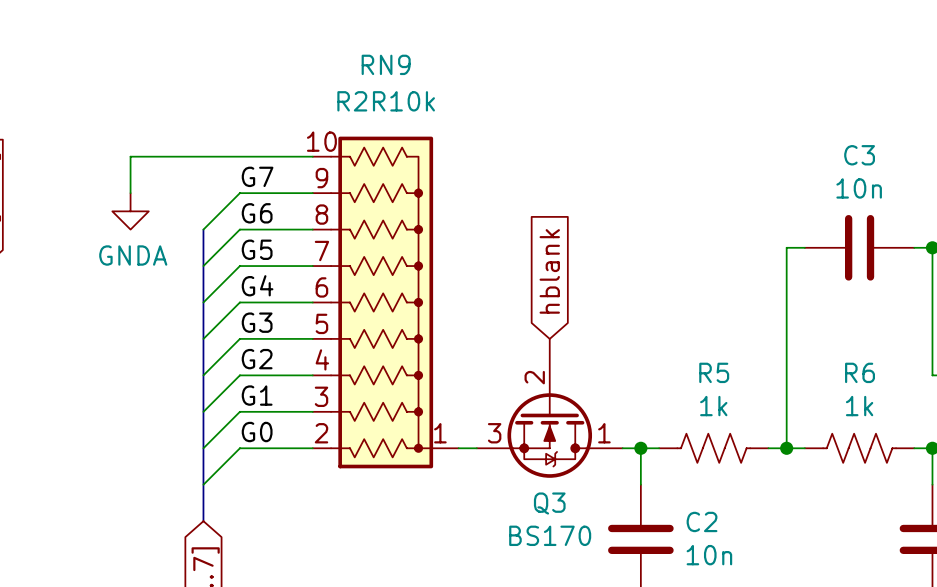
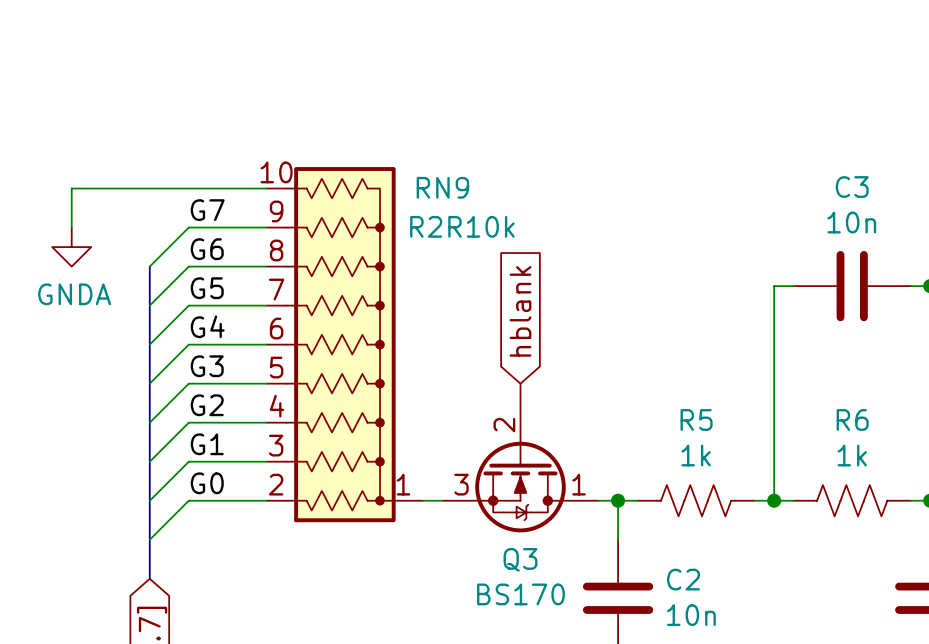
RN9 name position: RN9 (386, 64) -> RN9 (442, 187)
RN9 value position: R2R10k (386, 101) -> R2R10k (462, 226)

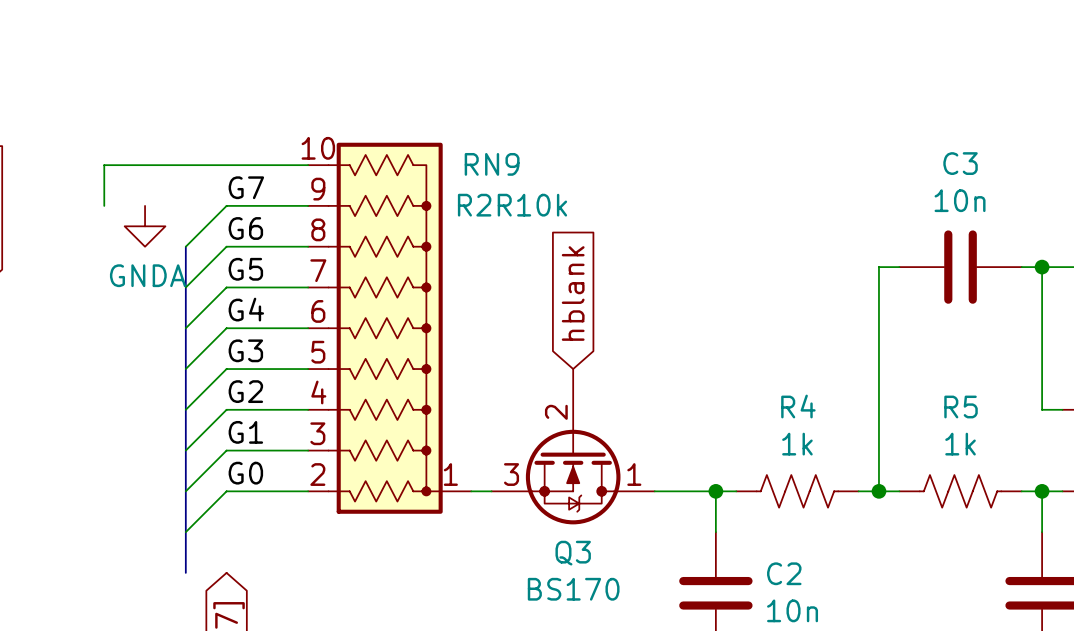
wire: (71, 188) (71, 227) -> (145, 165) (104, 165) (104, 205)
label position: G7 (207, 210) -> G7 (246, 187)
wire: (188, 227) (149, 266) -> (267, 205) (226, 205) (185, 246)
label position: G6 (207, 249) -> G6 (245, 228)
bus: (149, 266) (149, 578) -> (185, 246) (185, 572)
wire: (188, 266) (149, 305) -> (267, 246) (226, 246) (185, 287)
label position: G5 (207, 288) -> G5 (245, 269)
wire: (188, 305) (149, 344) -> (267, 287) (226, 287) (185, 328)
global label position: hblank (520, 311) -> hblank (573, 293)
label position: G4 (207, 326) -> G4 (246, 309)
wire: (188, 344) (149, 383) -> (267, 328) (226, 328) (185, 369)
RN9 position: (344, 344) -> (389, 328)
label position: G3 (207, 366) -> G3 (245, 350)
wire: (188, 383) (149, 422) -> (267, 369) (226, 369) (185, 409)
label position: G2 (207, 405) -> G2 (245, 391)
R5 name: R5 (696, 420) -> R4 (798, 406)
R6 name: R6 (852, 420) -> R5 (961, 407)
wire: (188, 422) (149, 461) -> (267, 409) (226, 409) (185, 450)
label position: G1 (207, 444) -> G1 (245, 432)
Q3 position: (520, 458) -> (573, 446)
wire: (188, 461) (149, 500) -> (267, 450) (226, 450) (185, 491)
label position: G0 (207, 483) -> G0 (245, 473)
wire: (188, 500) (149, 539) -> (267, 491) (226, 491) (185, 532)

